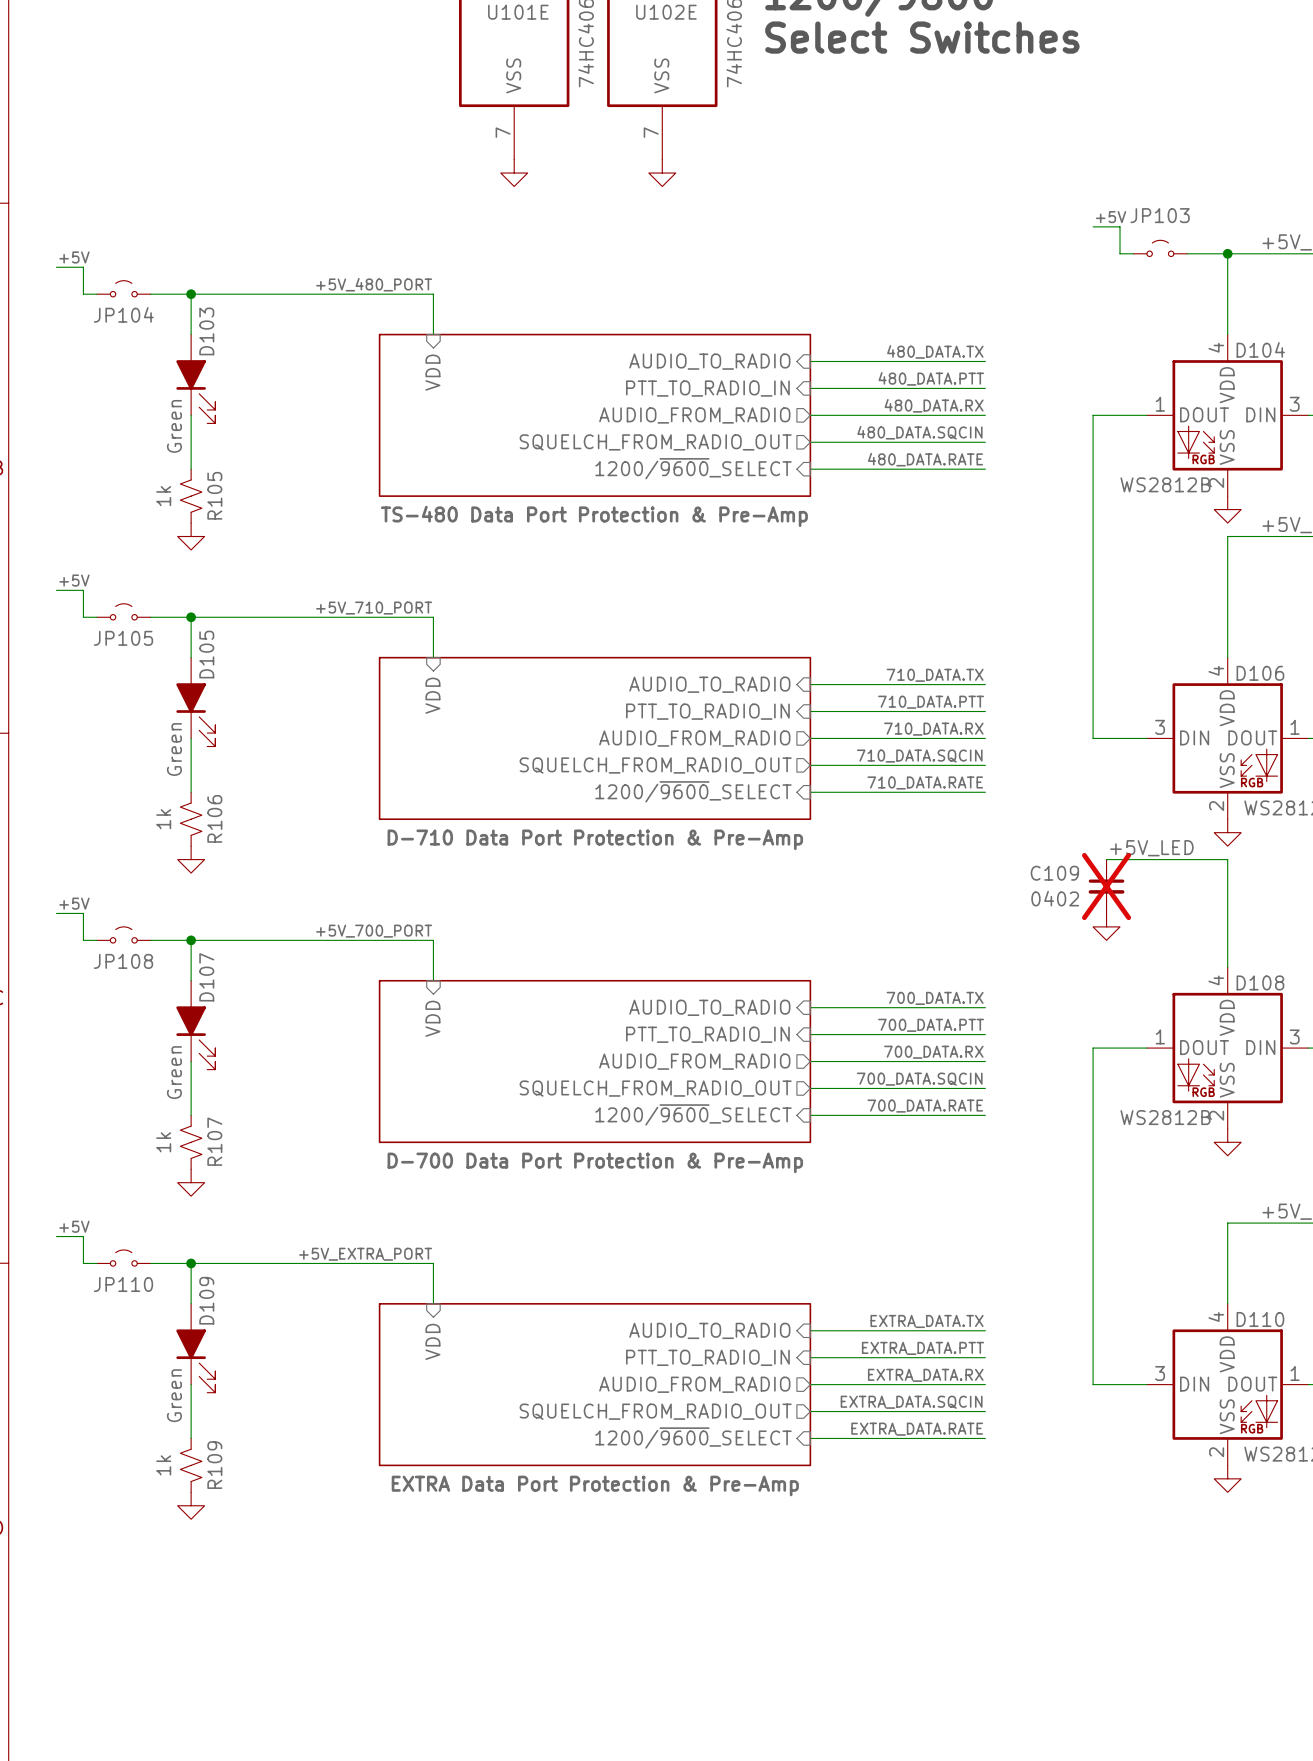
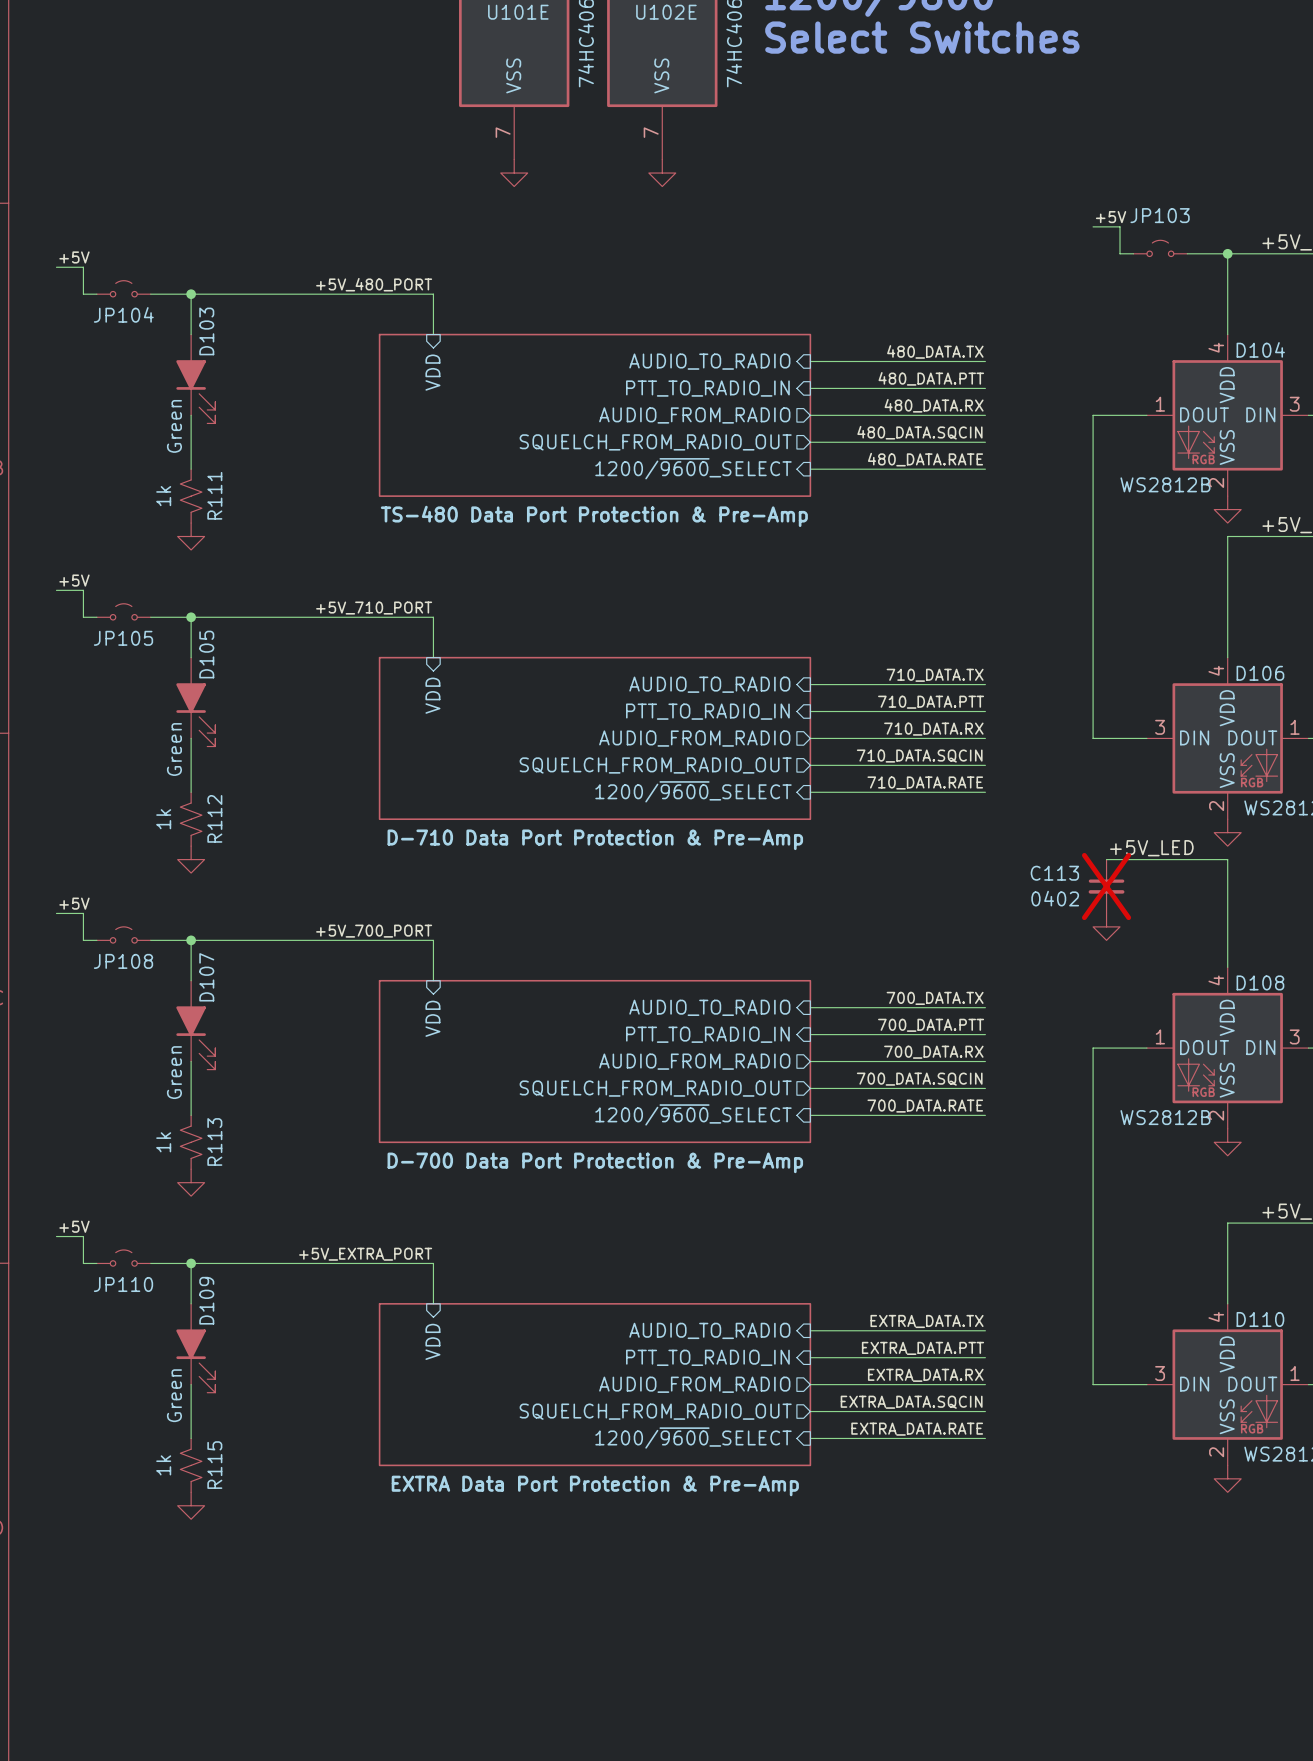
R105 name: R105 (214, 495) -> R111 (214, 495)
R106 name: R106 (214, 818) -> R112 (214, 818)
C109 name: C109 (1054, 873) -> C113 (1054, 873)
R107 name: R107 (214, 1141) -> R113 (214, 1141)
R109 name: R109 (214, 1465) -> R115 (214, 1465)

